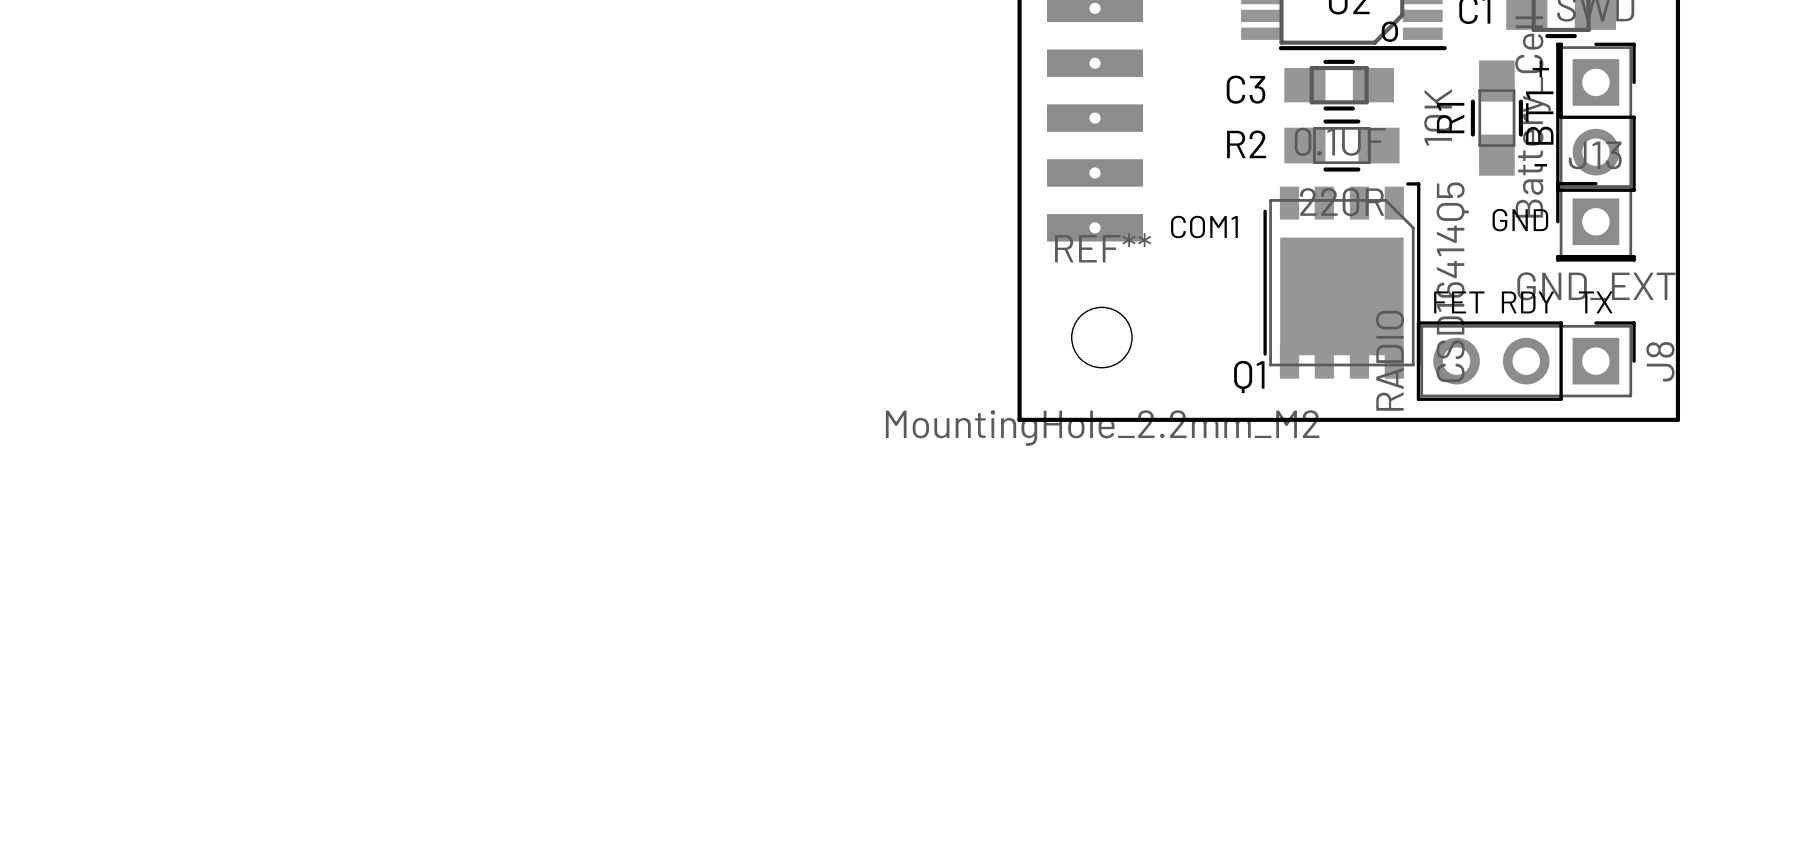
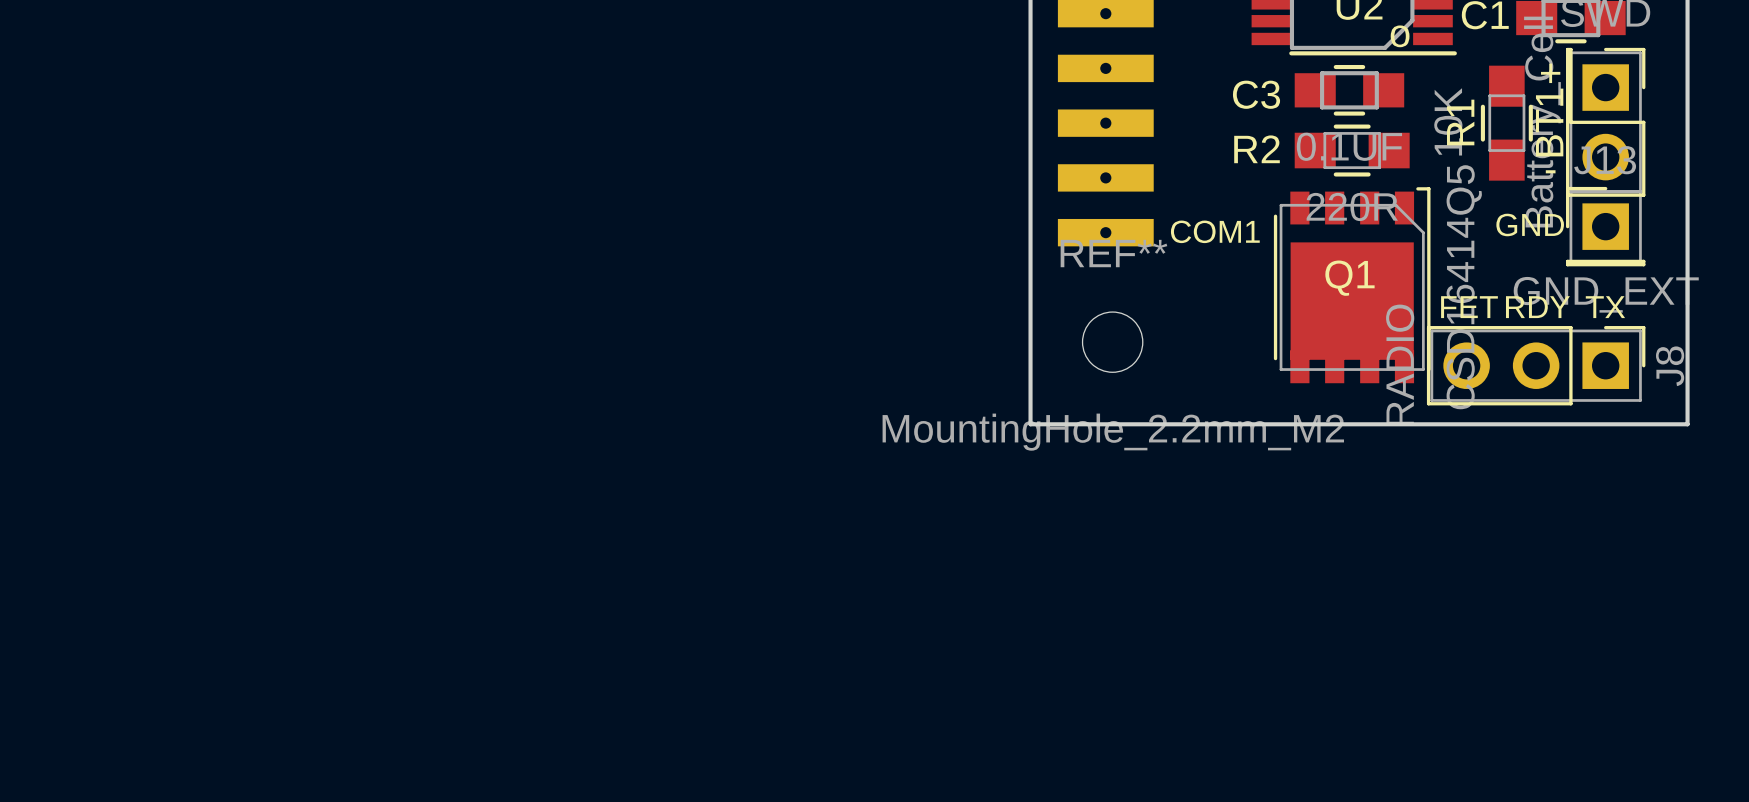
Q1 name position: Q1 (1249, 377) -> Q1 (1349, 278)

